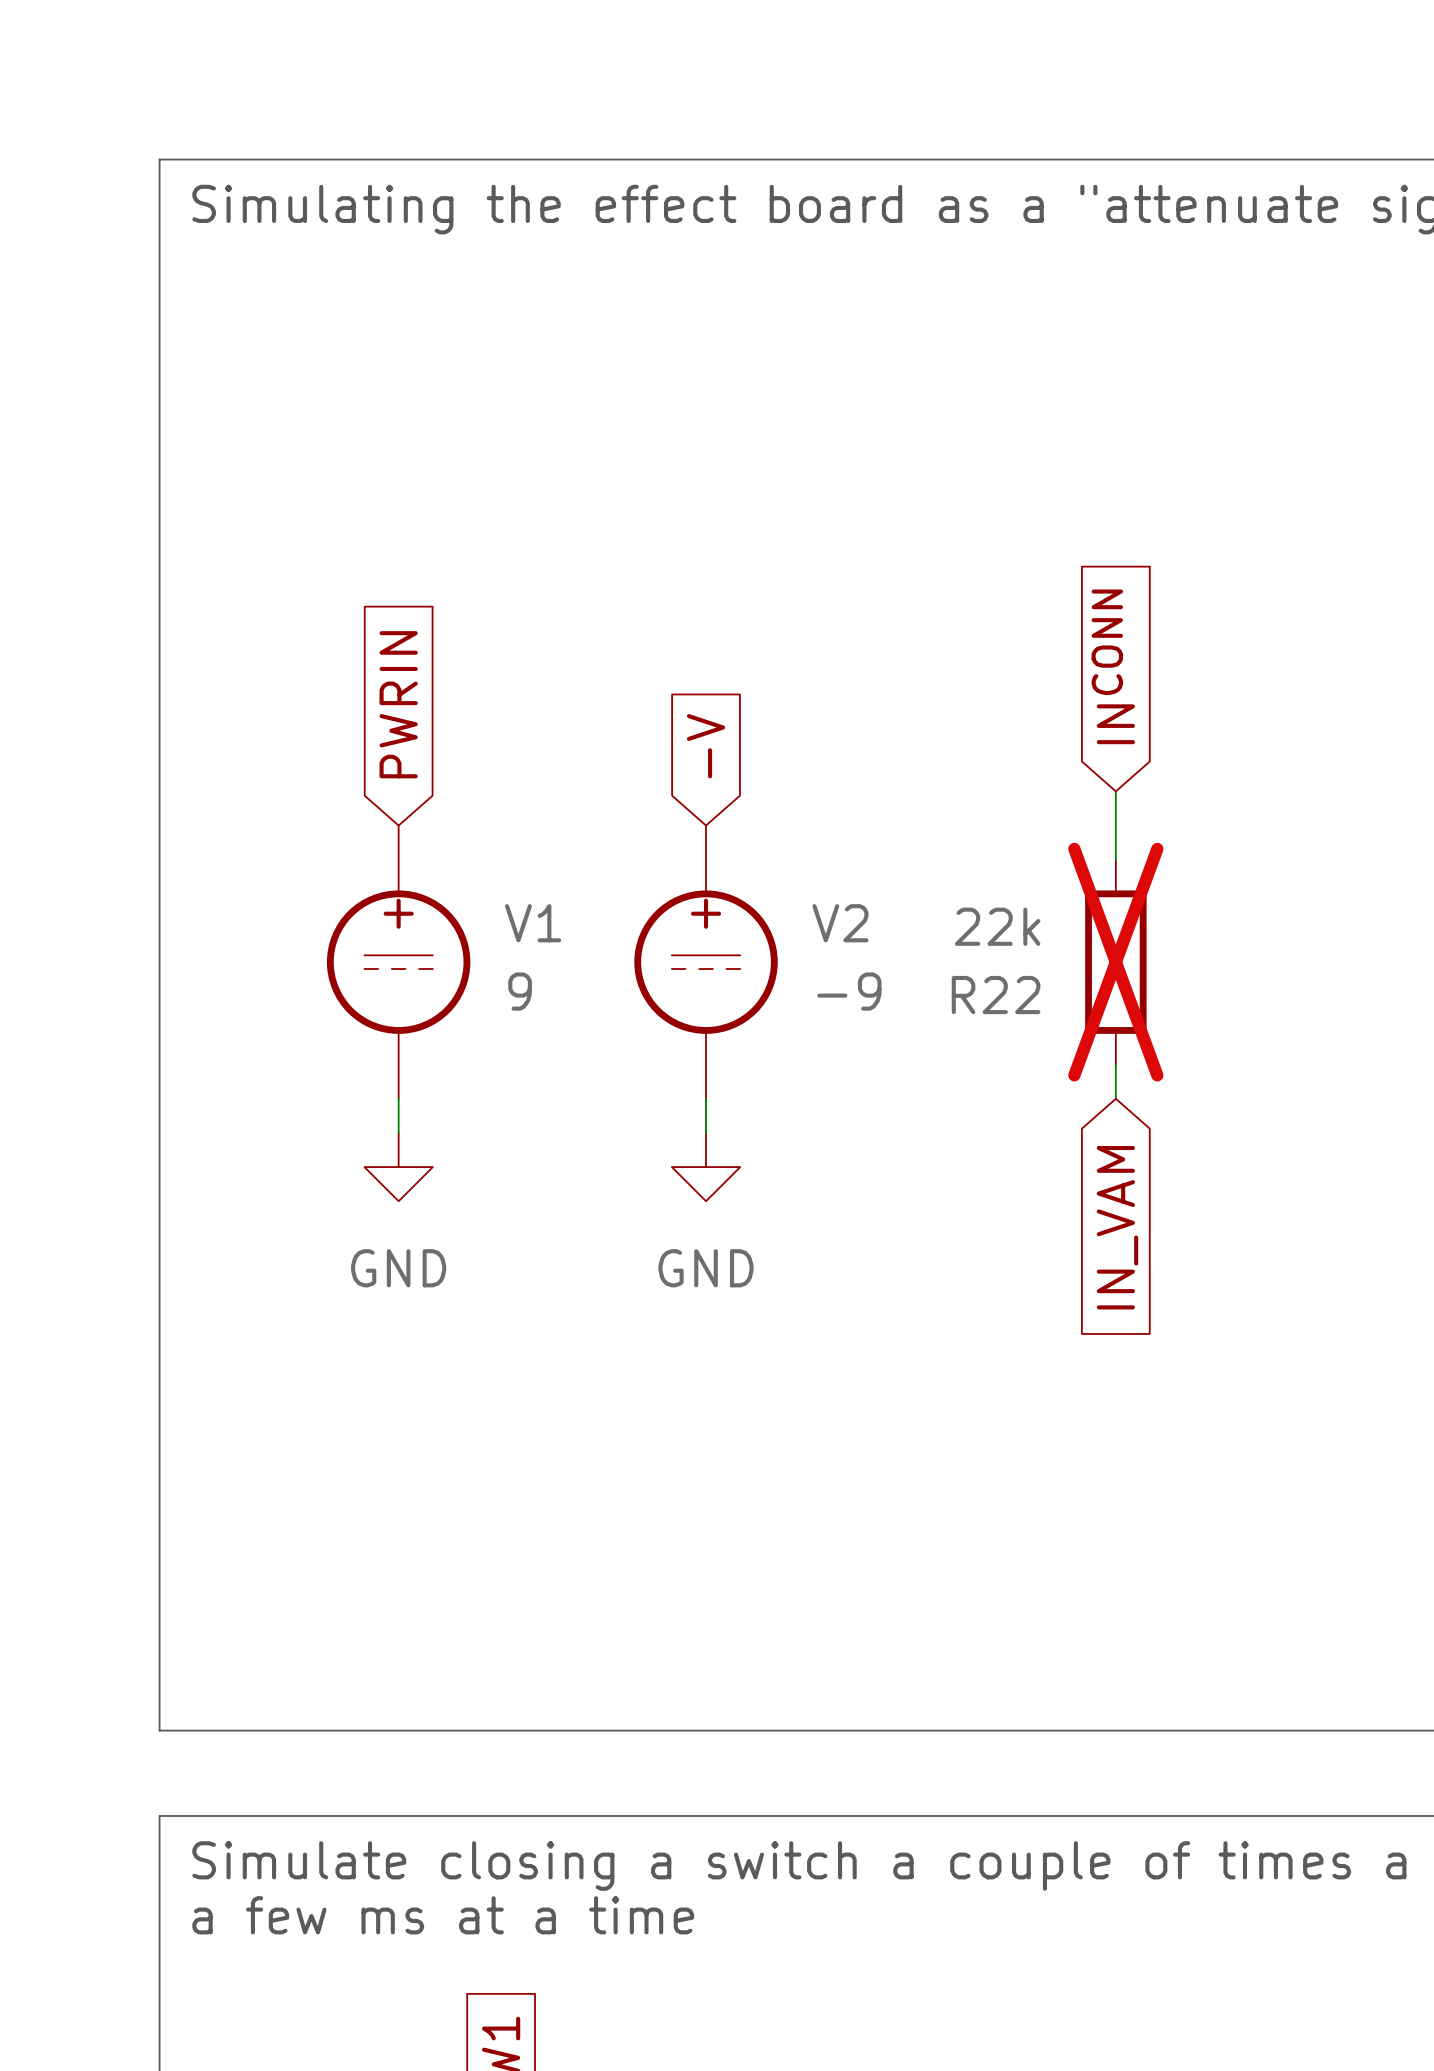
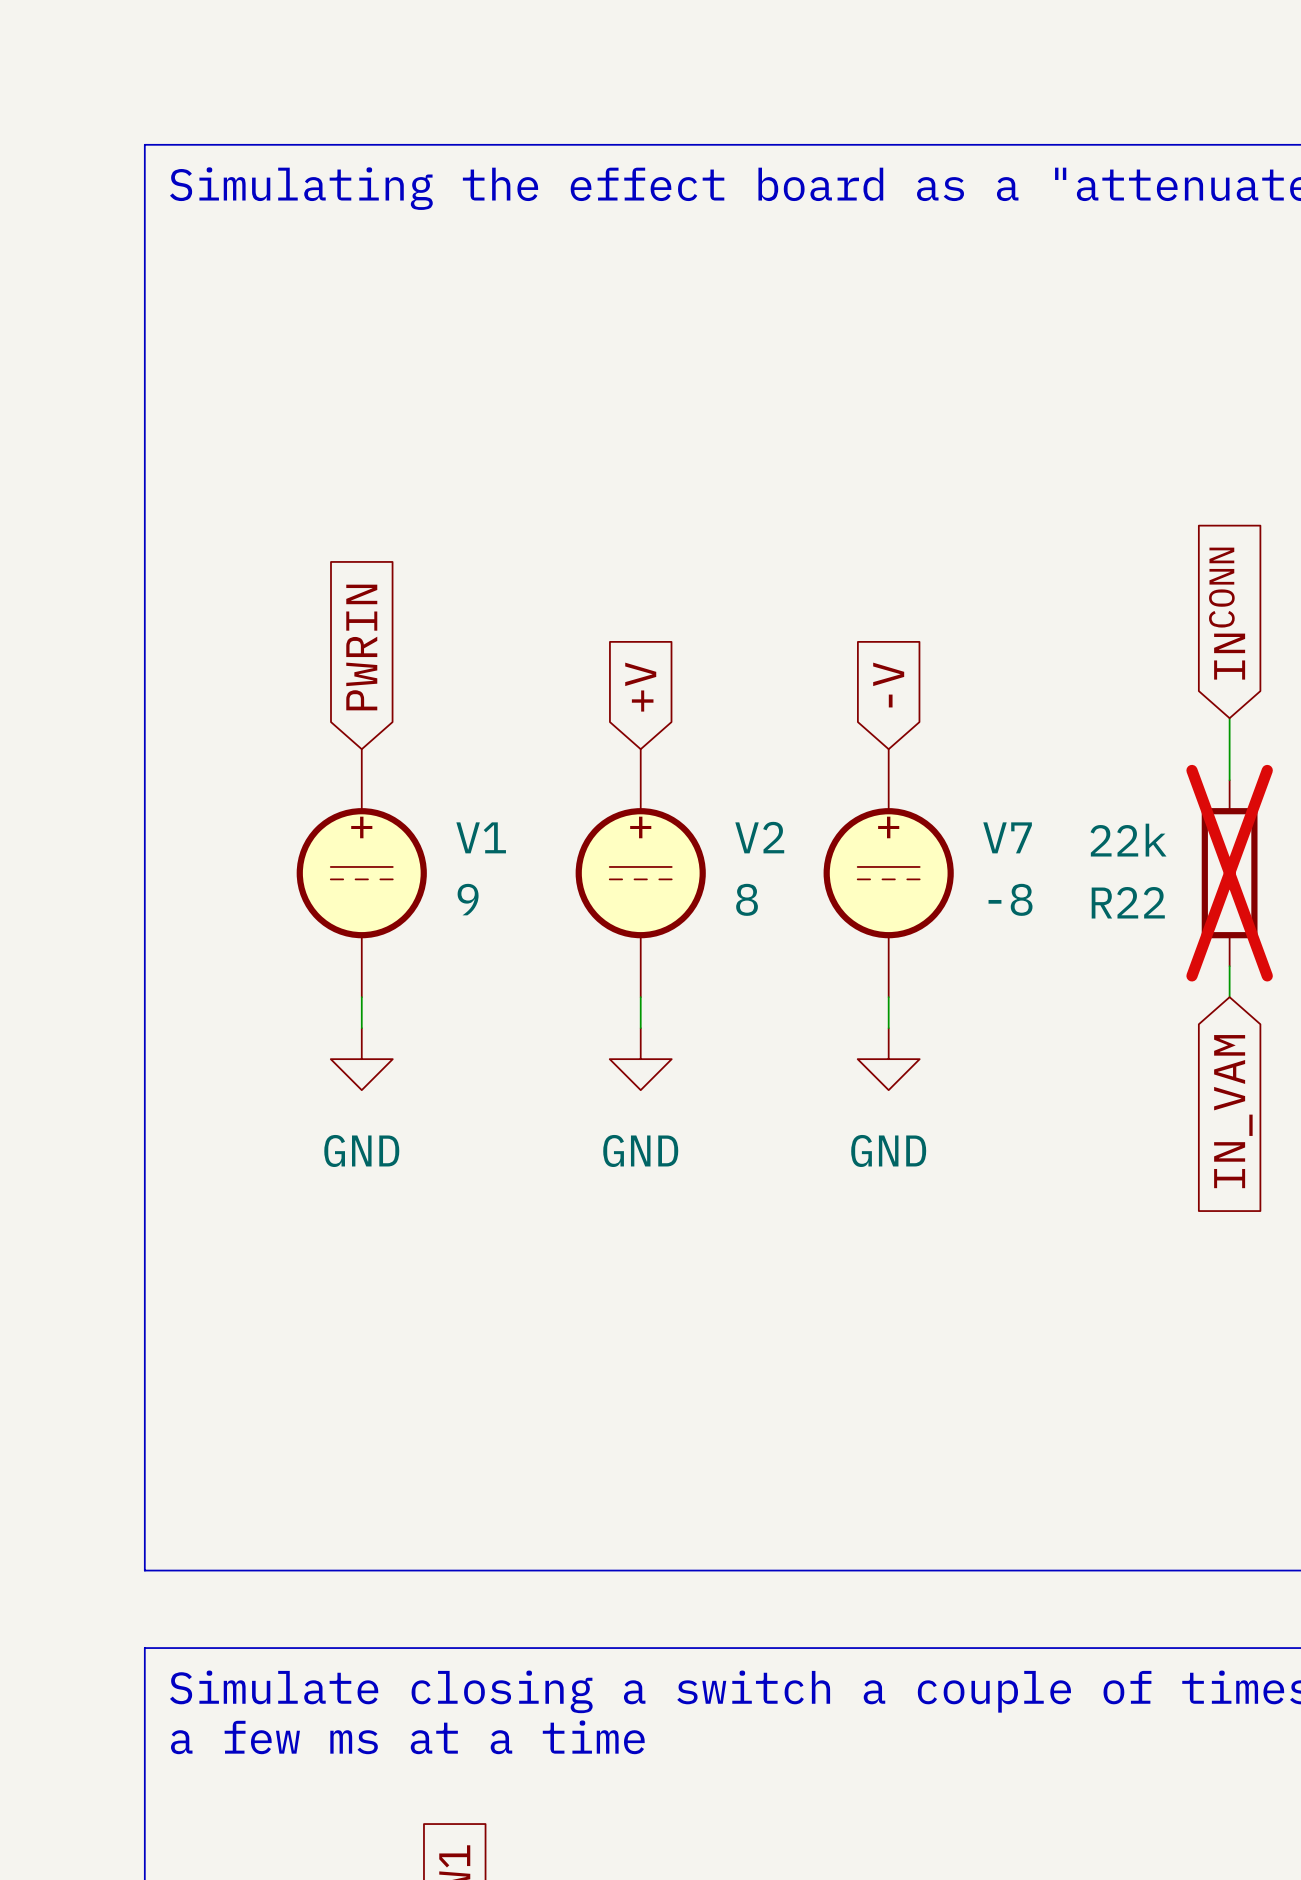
global label position: INCONN (1113, 666) -> INCONN (1227, 613)
global label: -V (706, 746) -> +V (640, 687)
global label: none -> -V (888, 685)
wire: (1115, 791) (1115, 859) -> (1229, 718) (1229, 780)
V7: none -> -8 (888, 873)
R22 position: (1115, 962) -> (1229, 873)
V2 value: -9 (849, 991) -> 8 (747, 899)
wire: (1115, 1064) (1115, 1098) -> (888, 997) (888, 1028)
wire: none -> (1229, 966) (1229, 997)
power symbol: none -> GND (888, 1059)
global label position: IN_VAM (1117, 1227) -> IN_VAM (1233, 1111)

